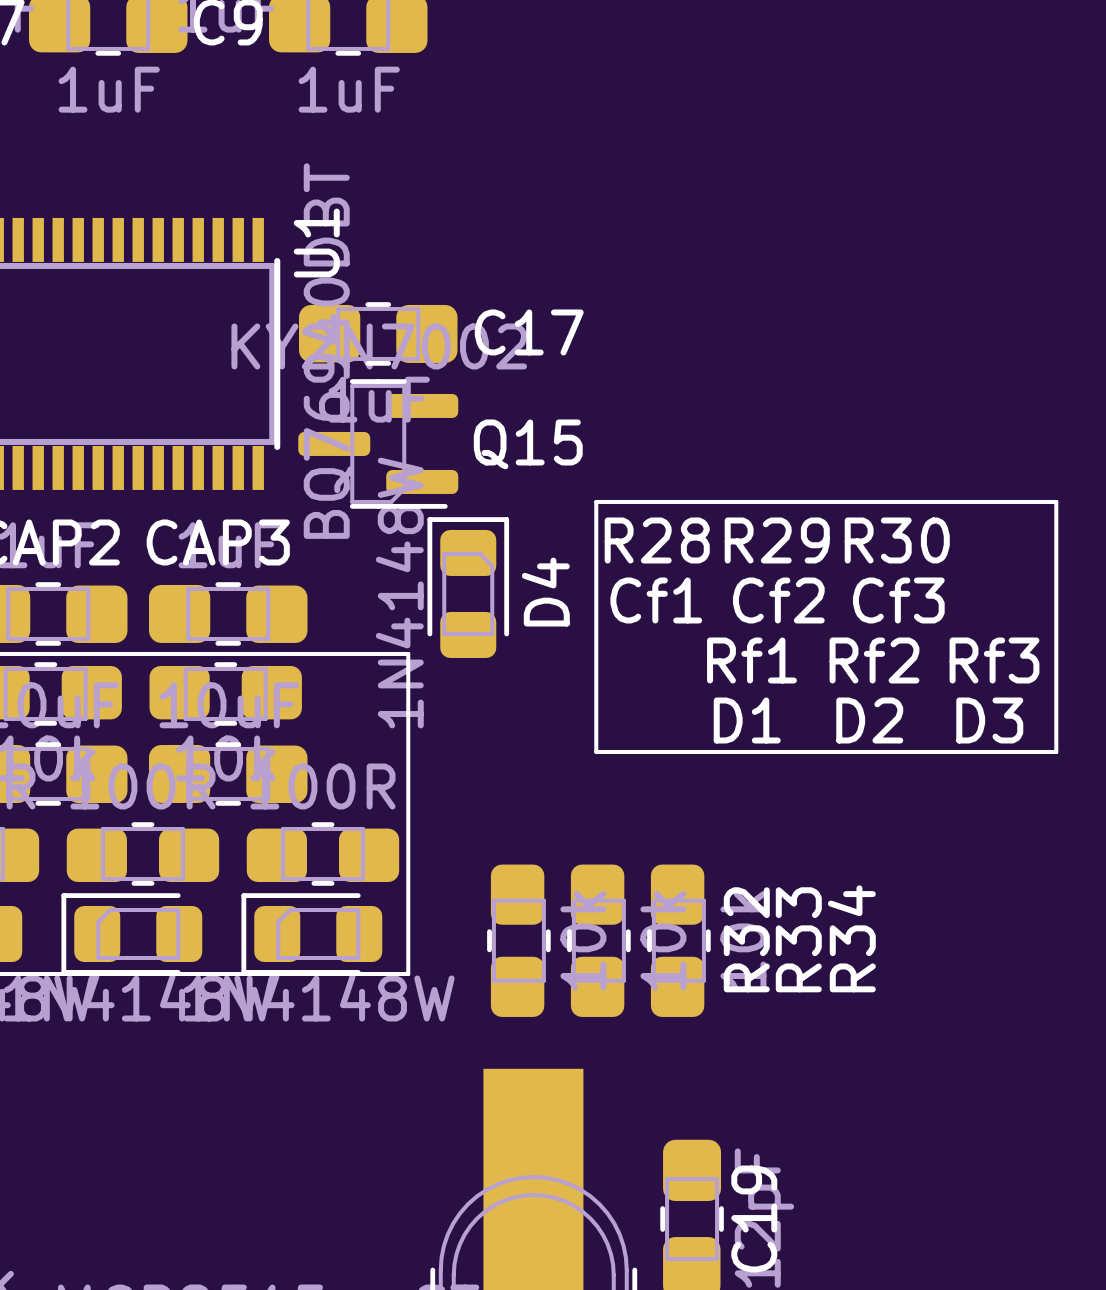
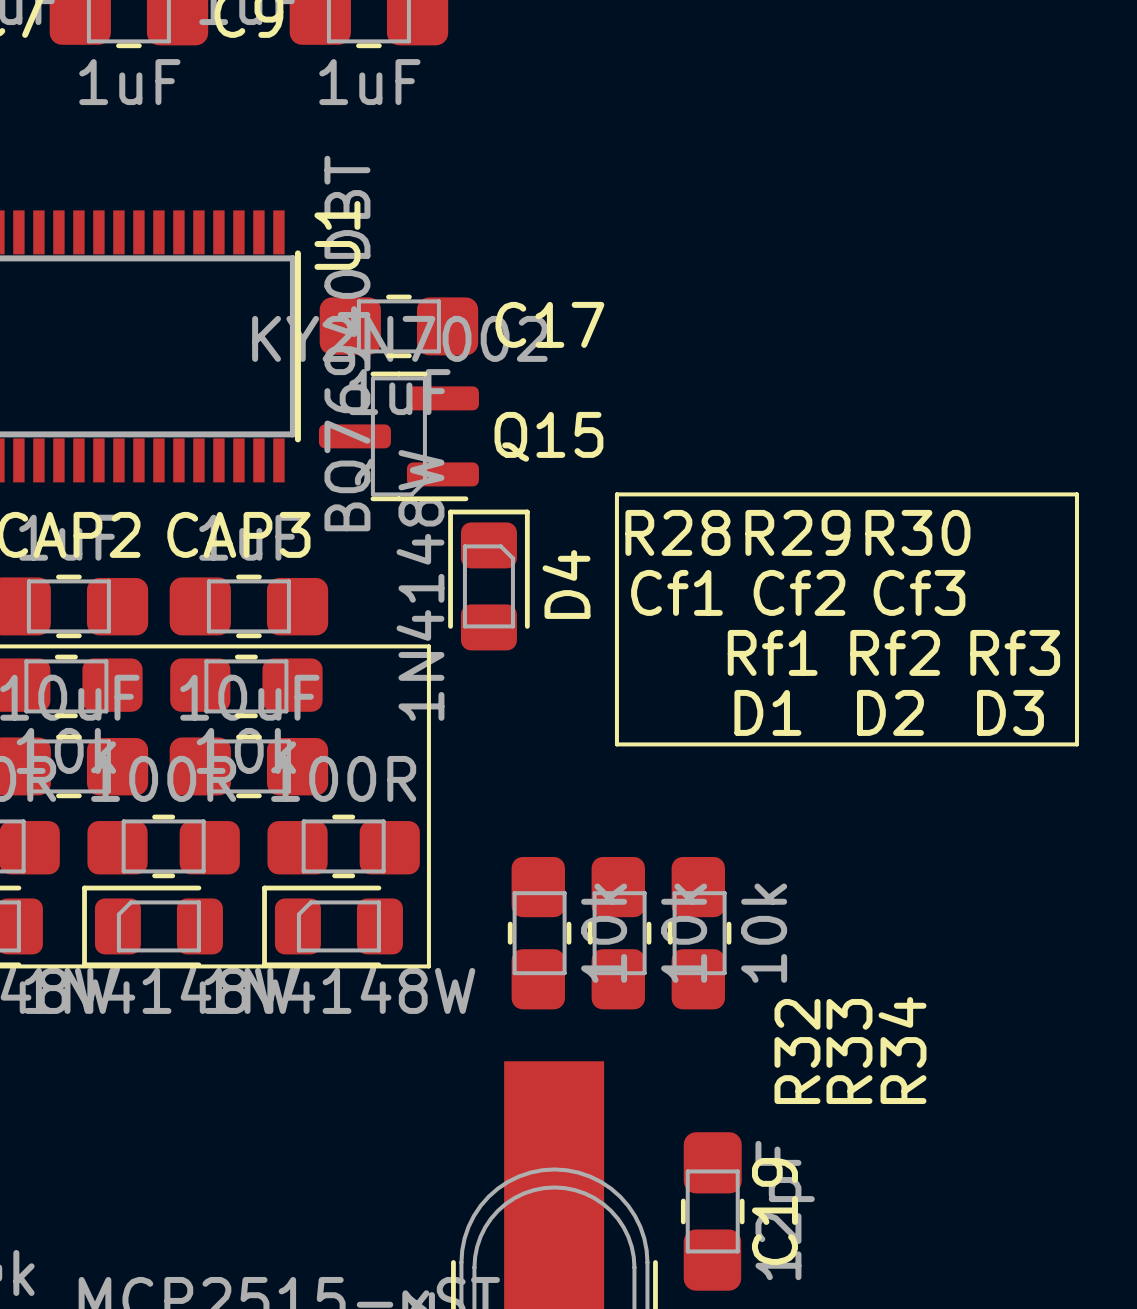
R34 name position: R34 (851, 938) -> R34 (902, 1050)
R32 name position: R32 (746, 939) -> R32 (797, 1051)
R33 name position: R33 (798, 939) -> R33 (849, 1051)

